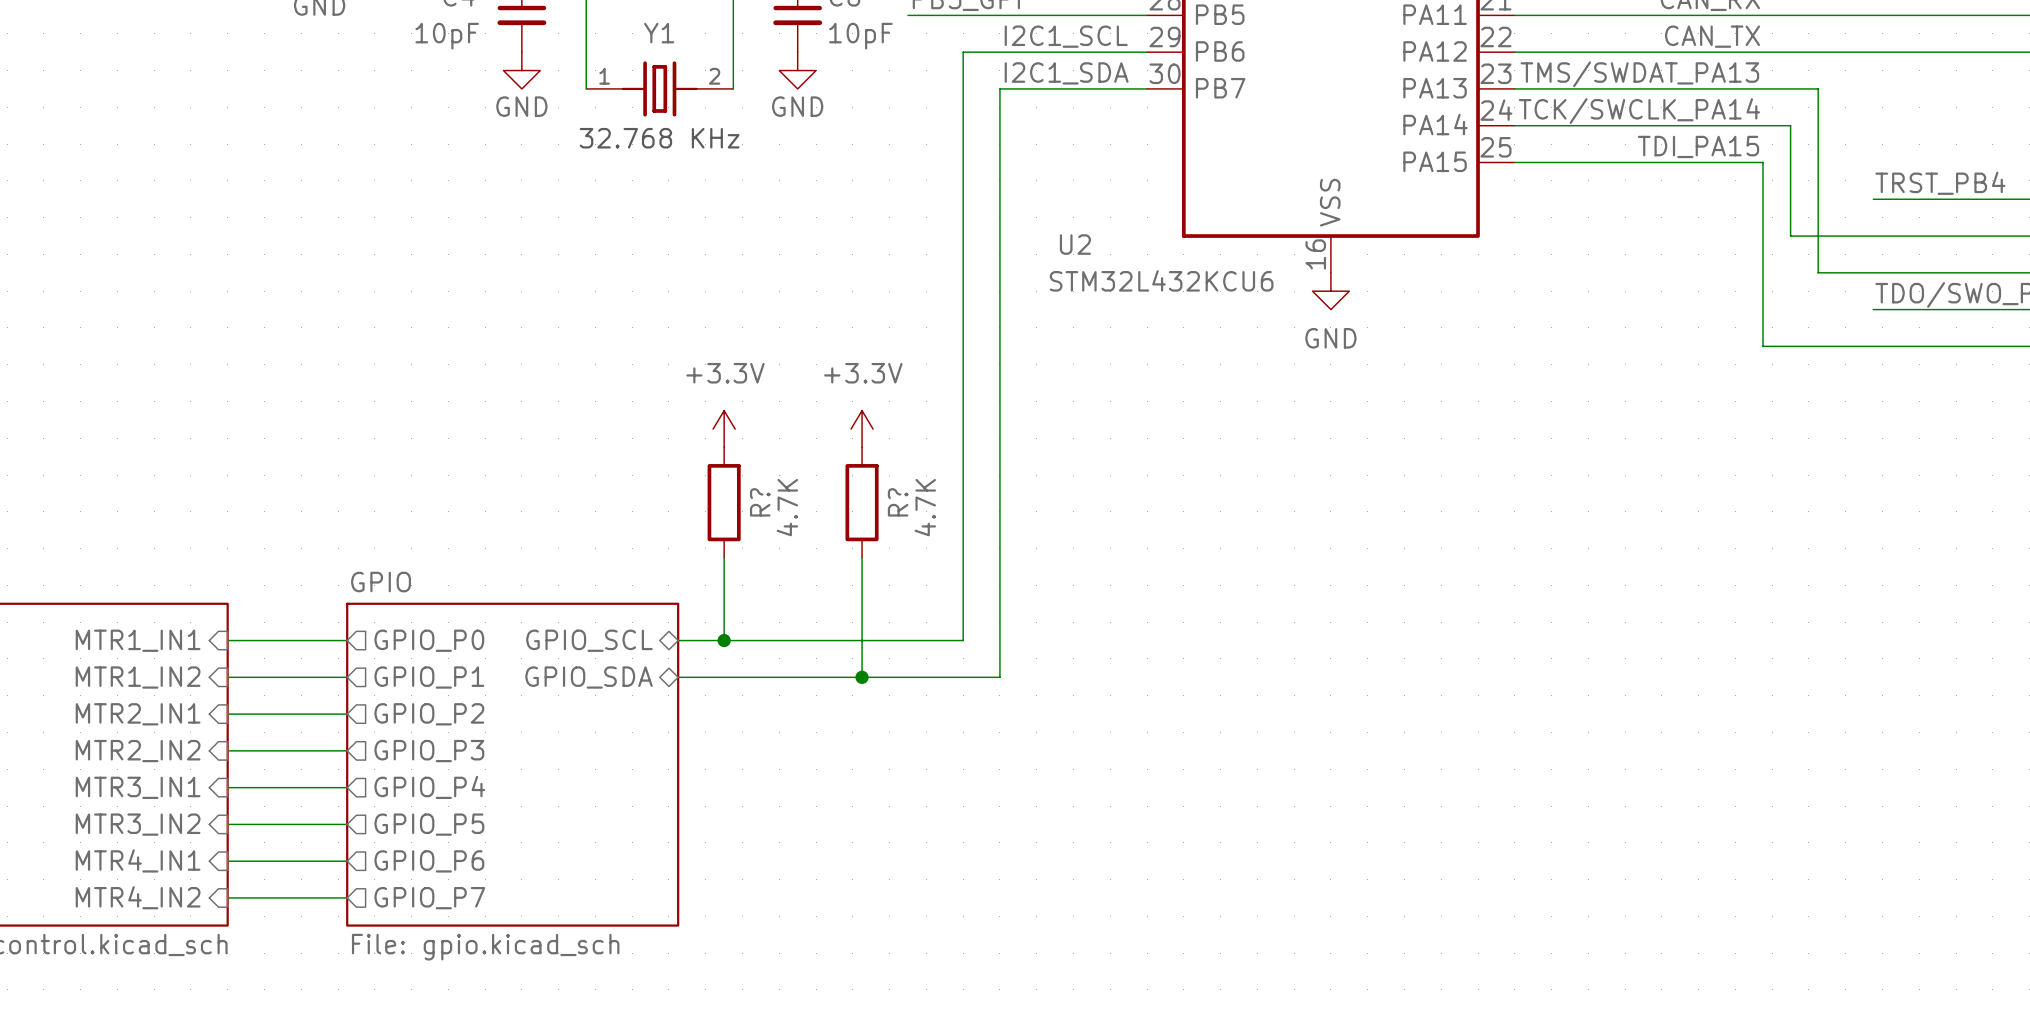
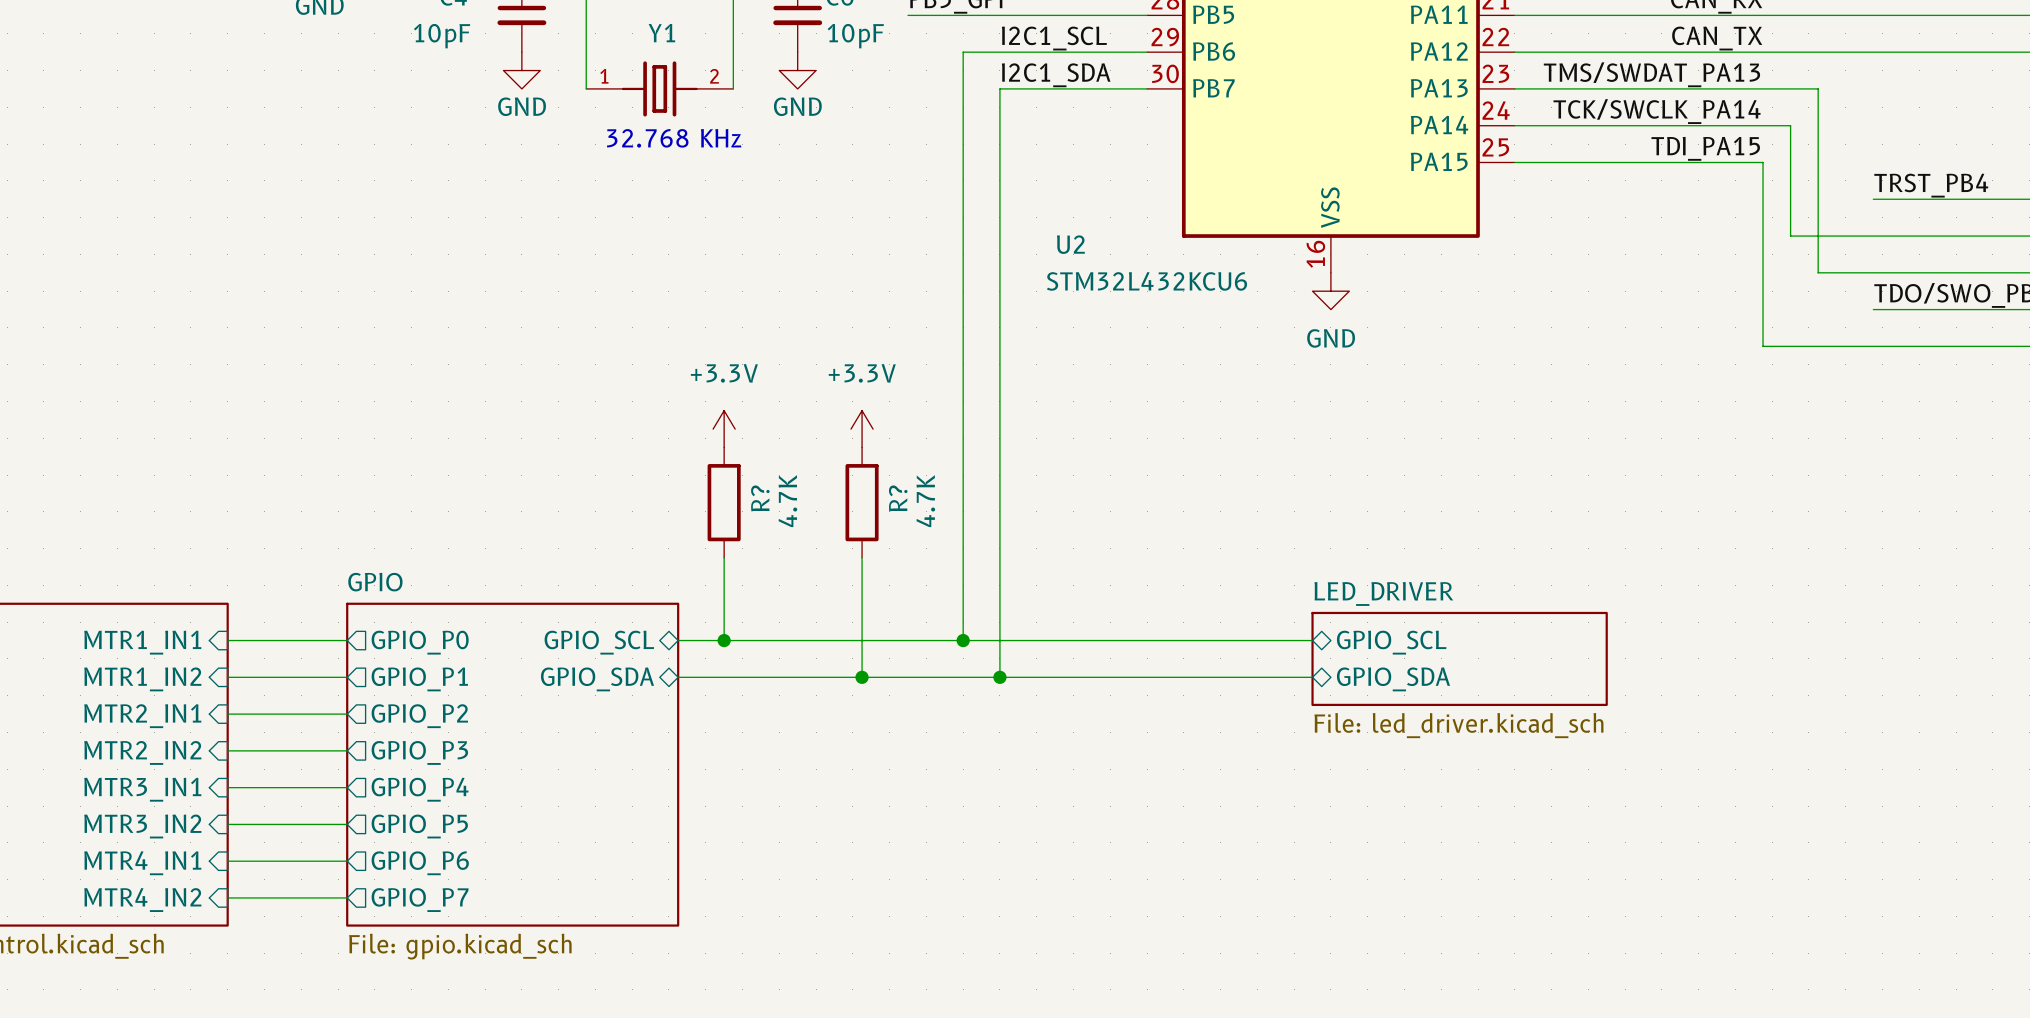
wire: none -> (963, 640) (1312, 640)
junction: none -> (963, 640)
sheet pin: none -> GPIO_SCL (1391, 642)
sheet LED_DRIVER: none -> File: led_driver.kicad_sch (1459, 658)
wire: none -> (999, 677) (1312, 677)
junction: none -> (999, 677)
sheet pin: none -> GPIO_SDA (1393, 679)

